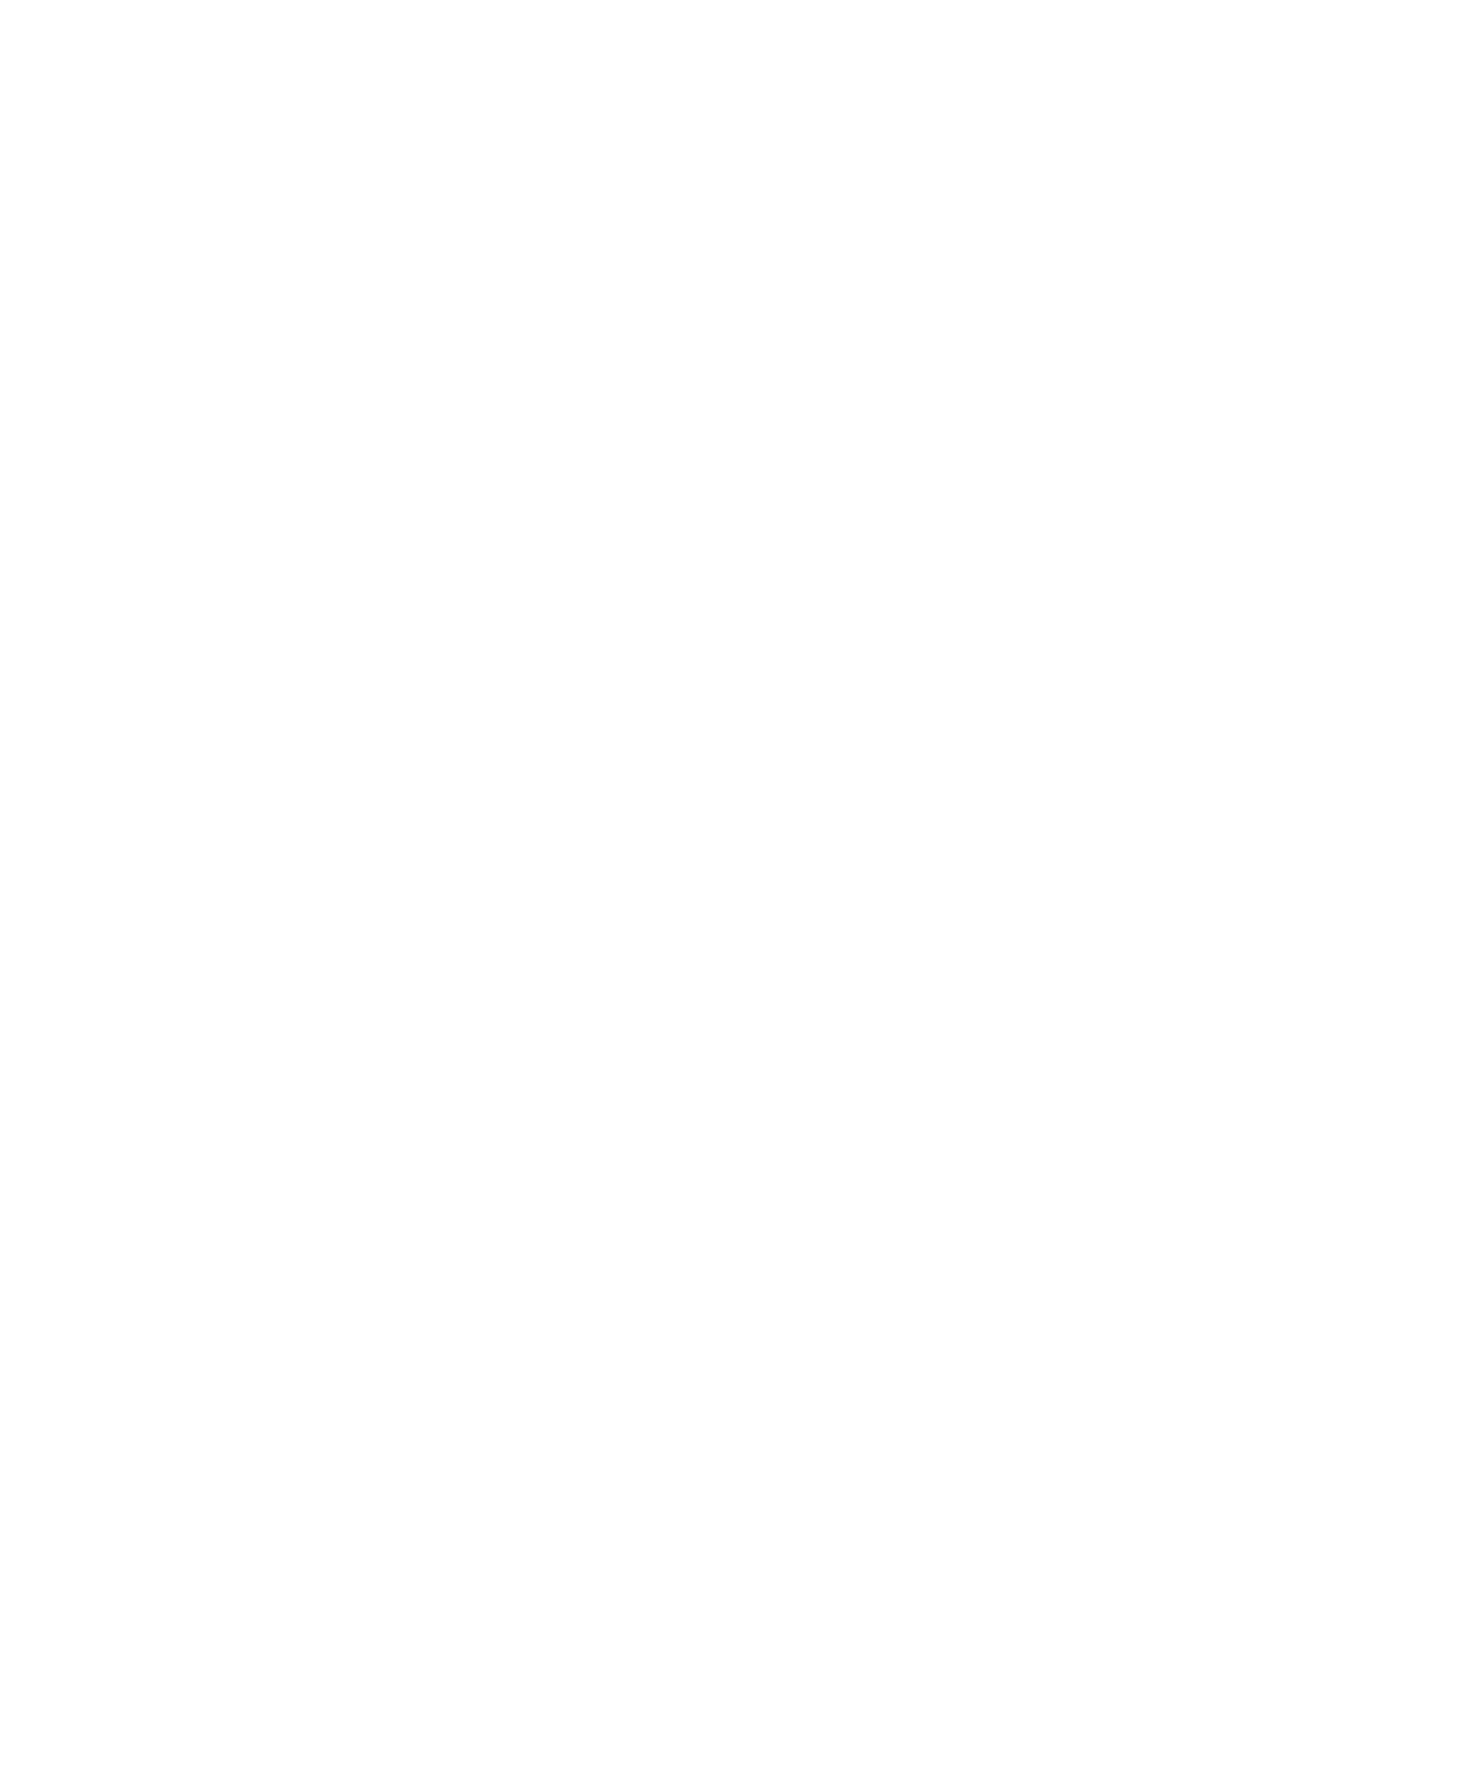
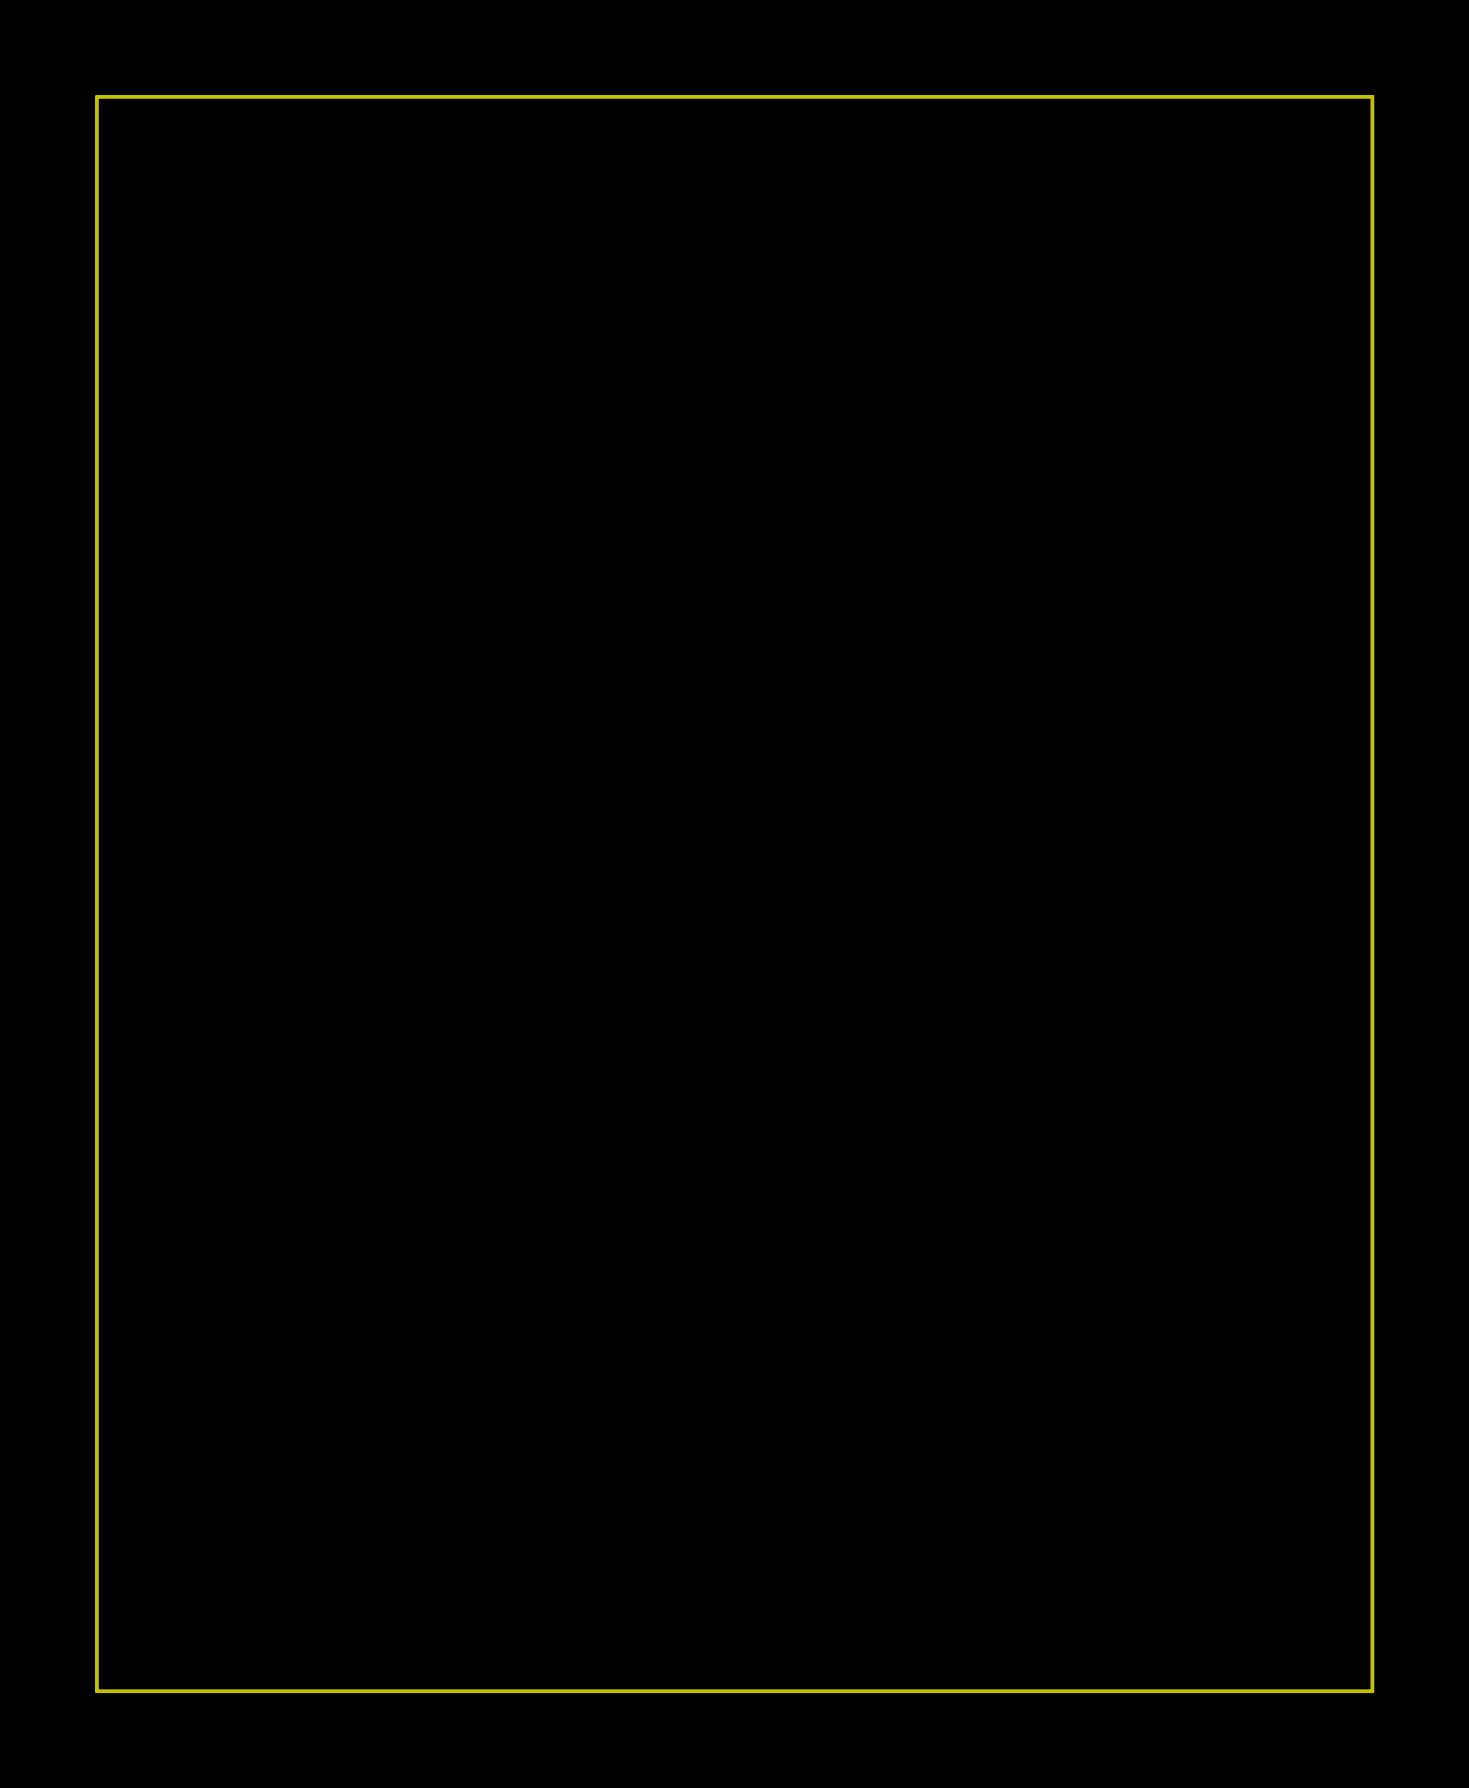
board edge: none -> (1372, 96) (1372, 1691) (96, 1691) (96, 96) (1372, 96)

